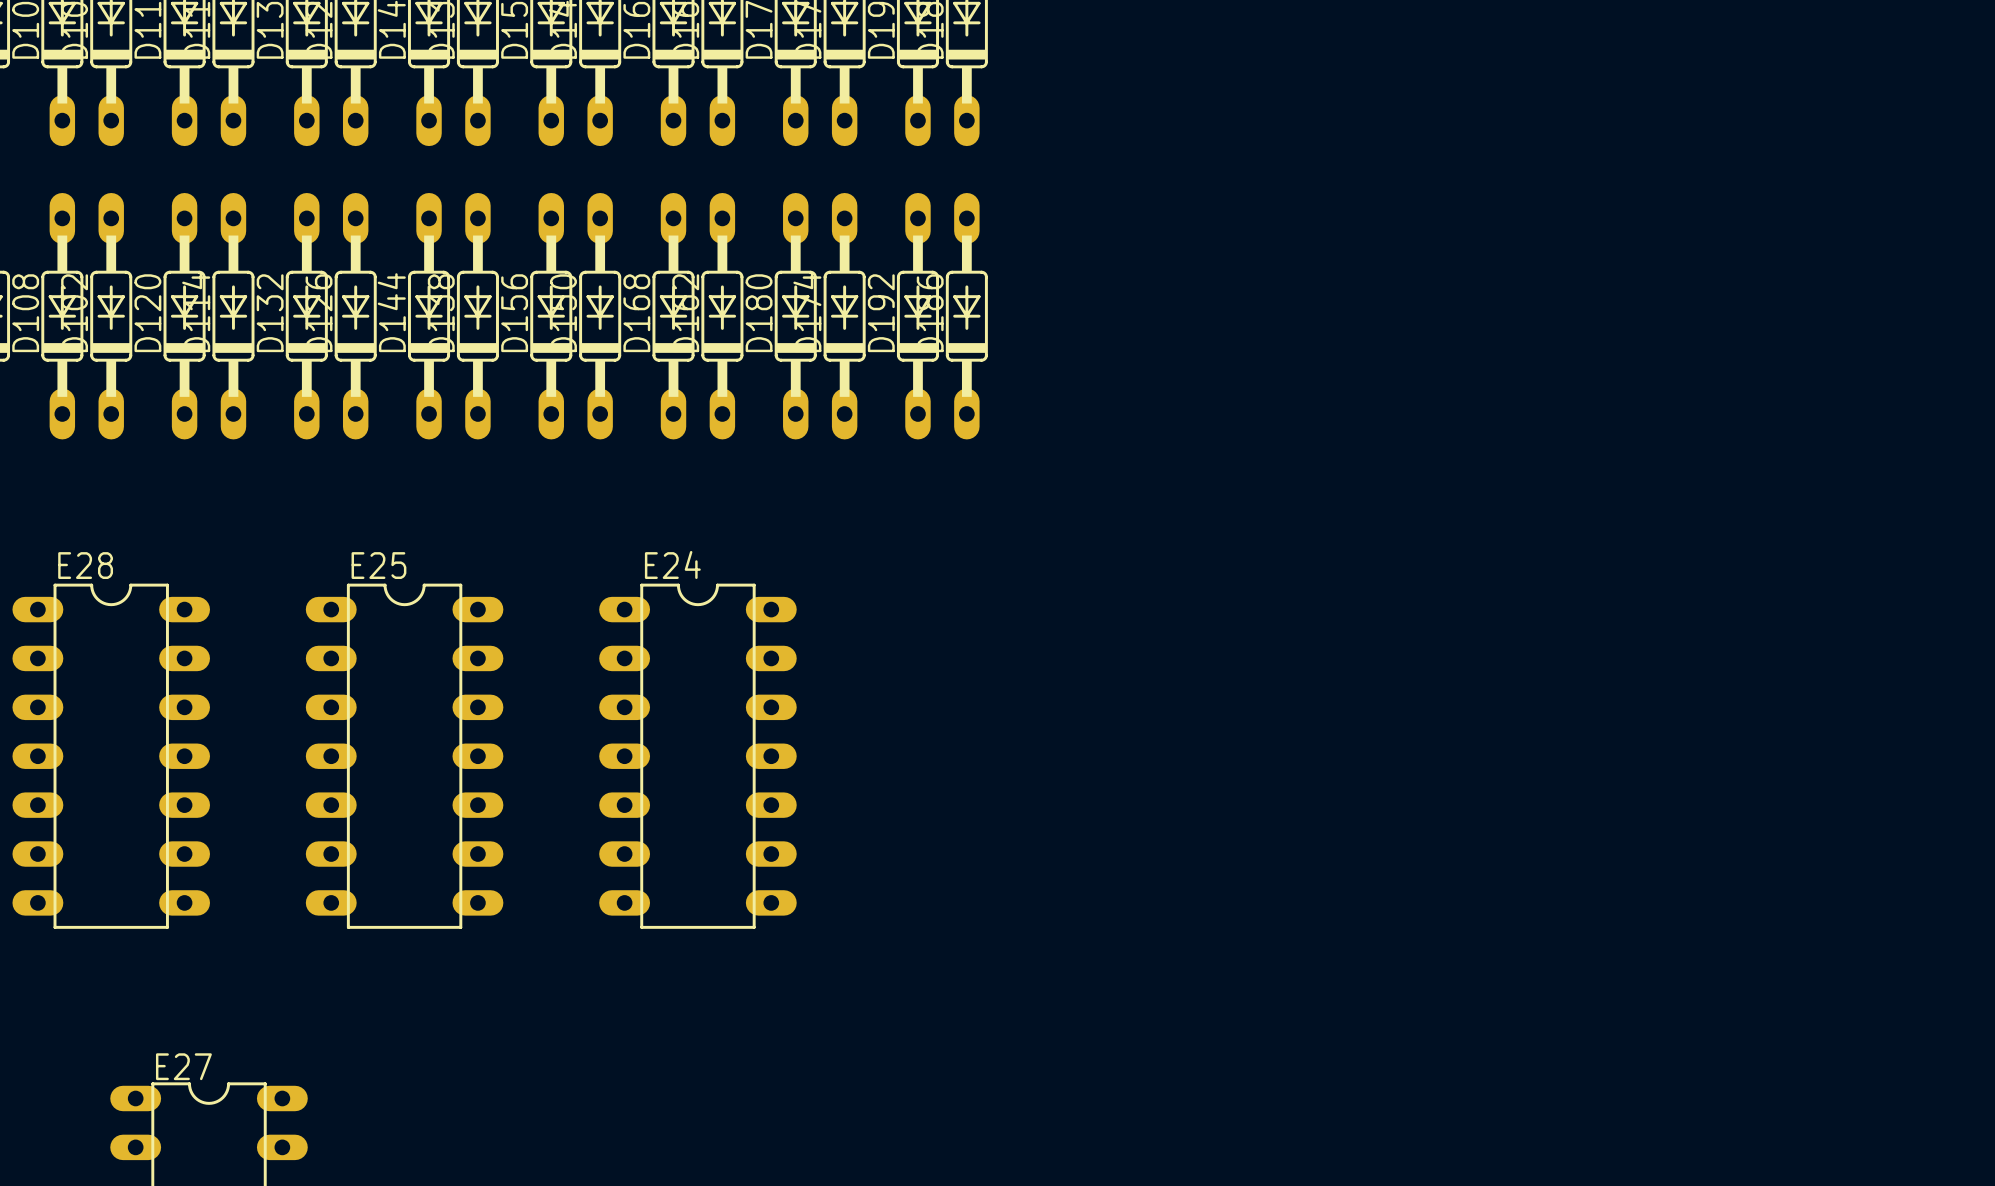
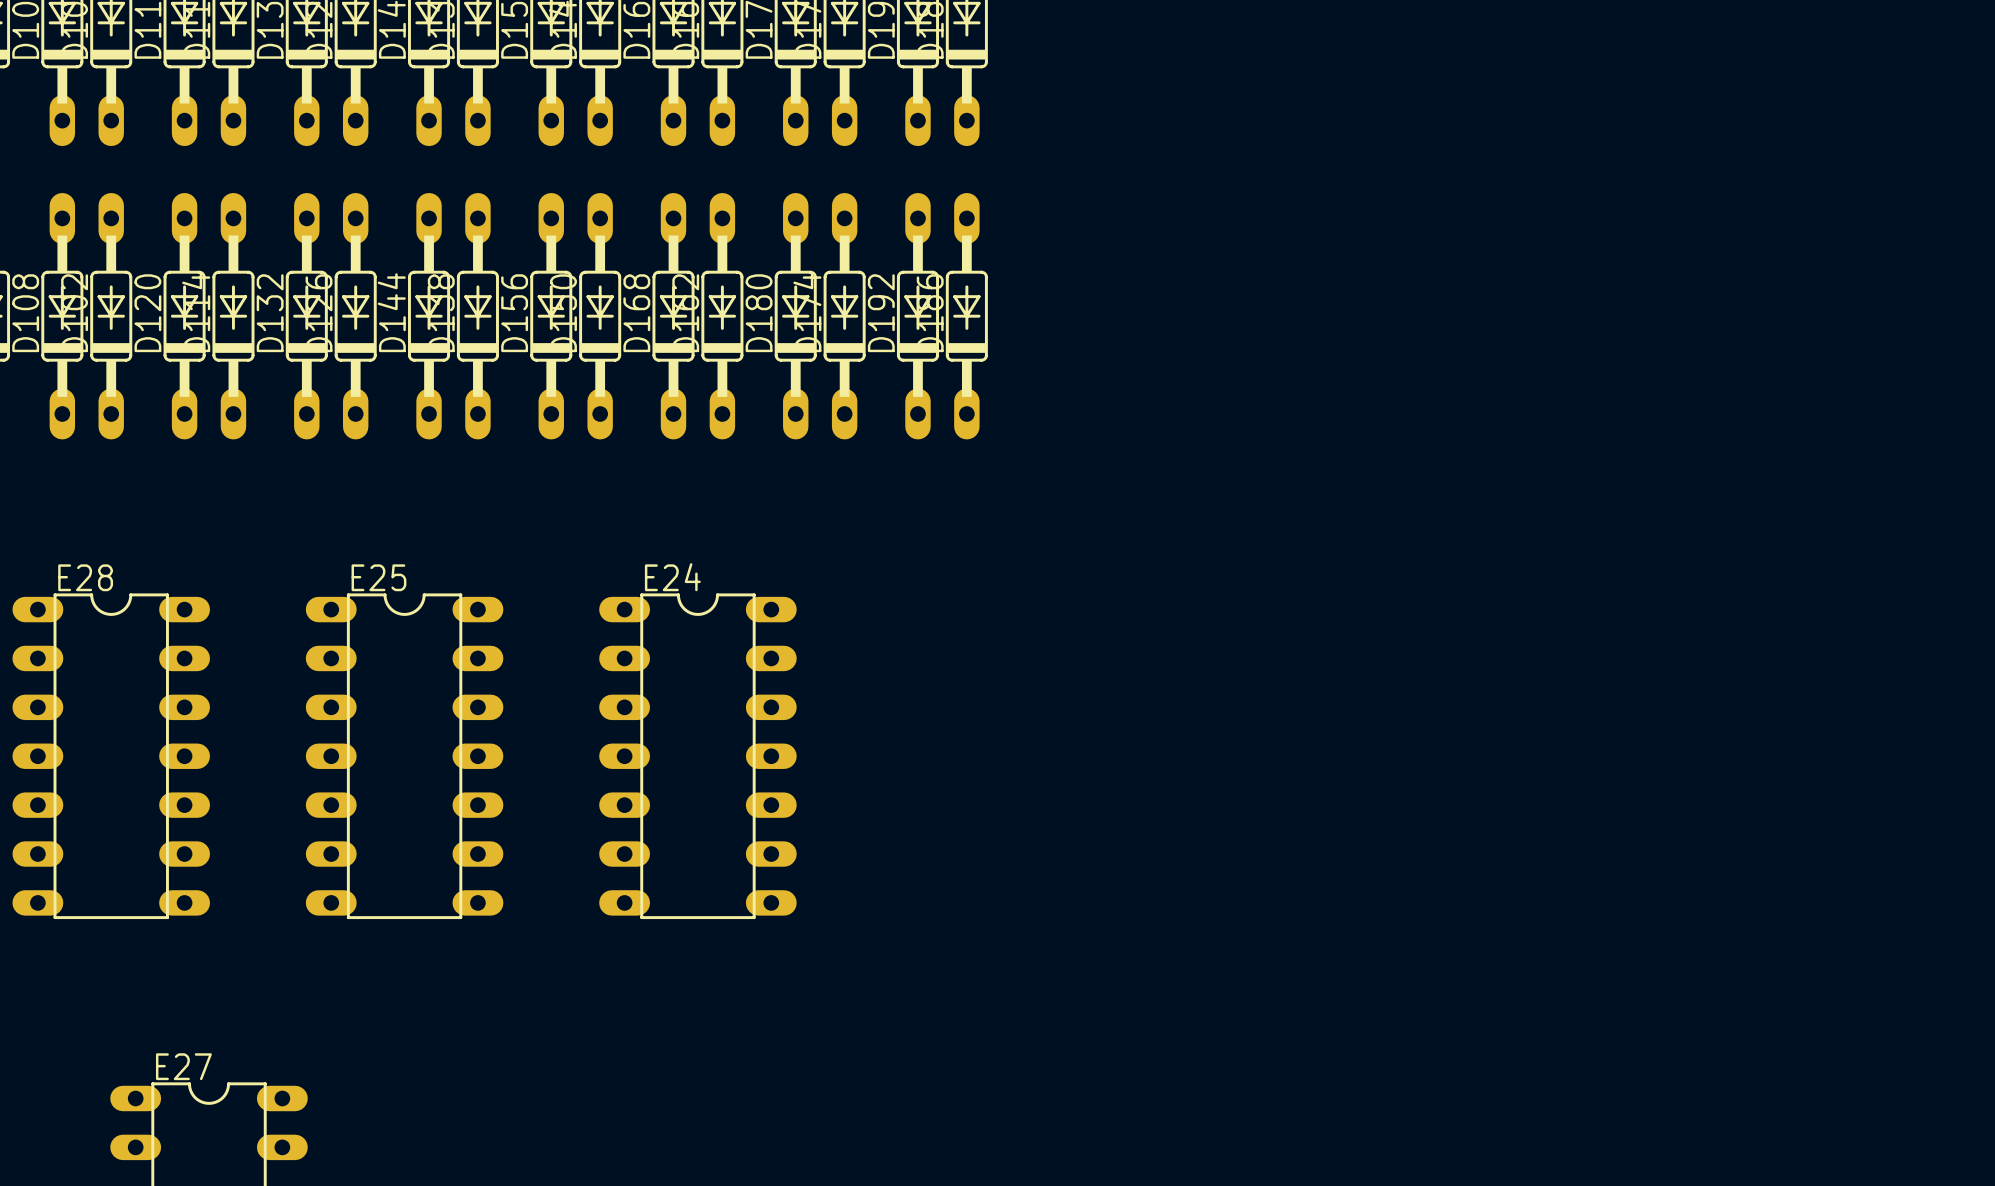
E24 name position: E24 (672, 564) -> E24 (672, 577)
E28 name position: E28 (85, 565) -> E28 (85, 577)
E25 name position: E25 (378, 565) -> E25 (378, 577)
E28 footprint: [12, 583, 210, 929] -> [12, 593, 210, 920]
E25 footprint: [305, 583, 504, 929] -> [305, 593, 504, 920]
E24 footprint: [599, 583, 797, 929] -> [599, 593, 797, 920]

